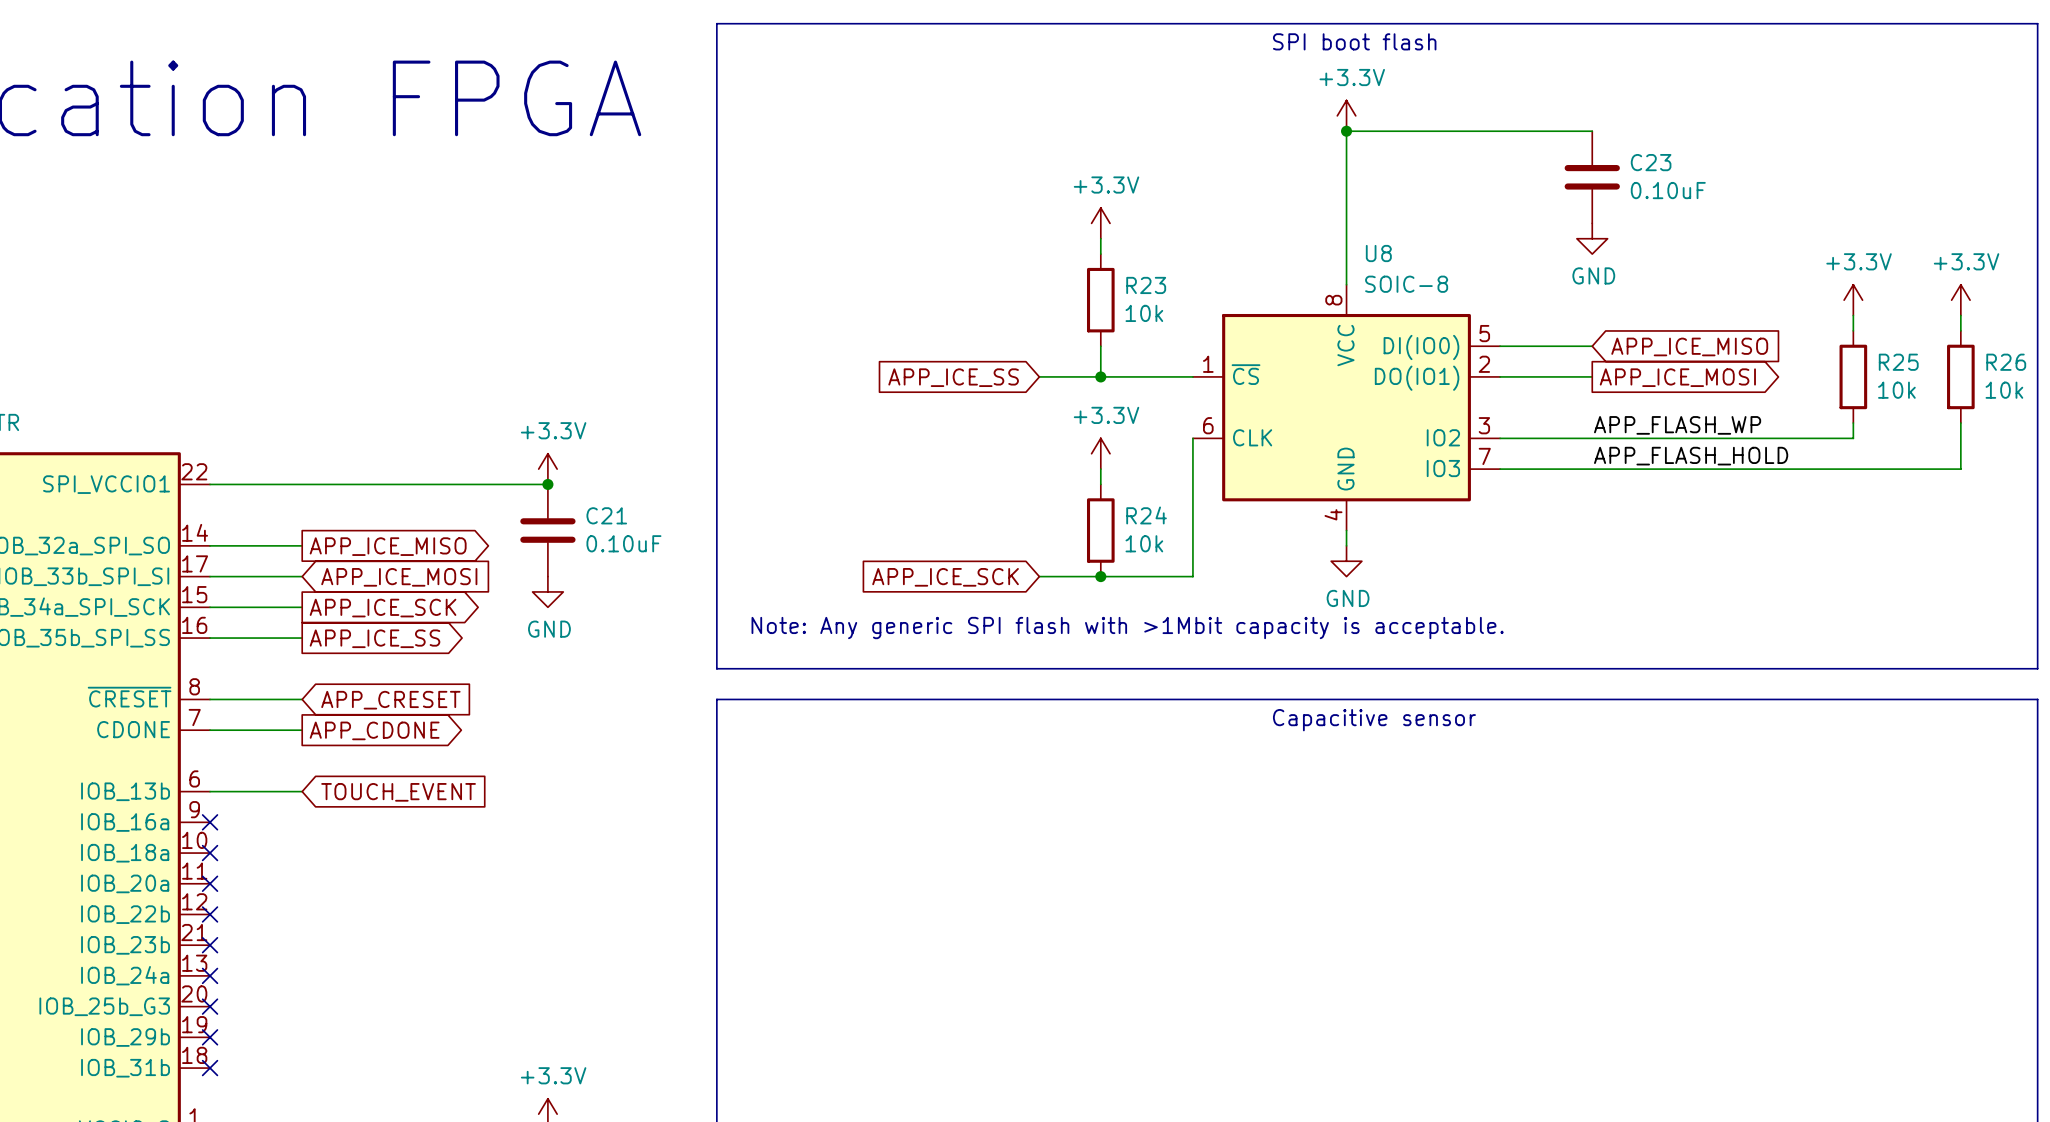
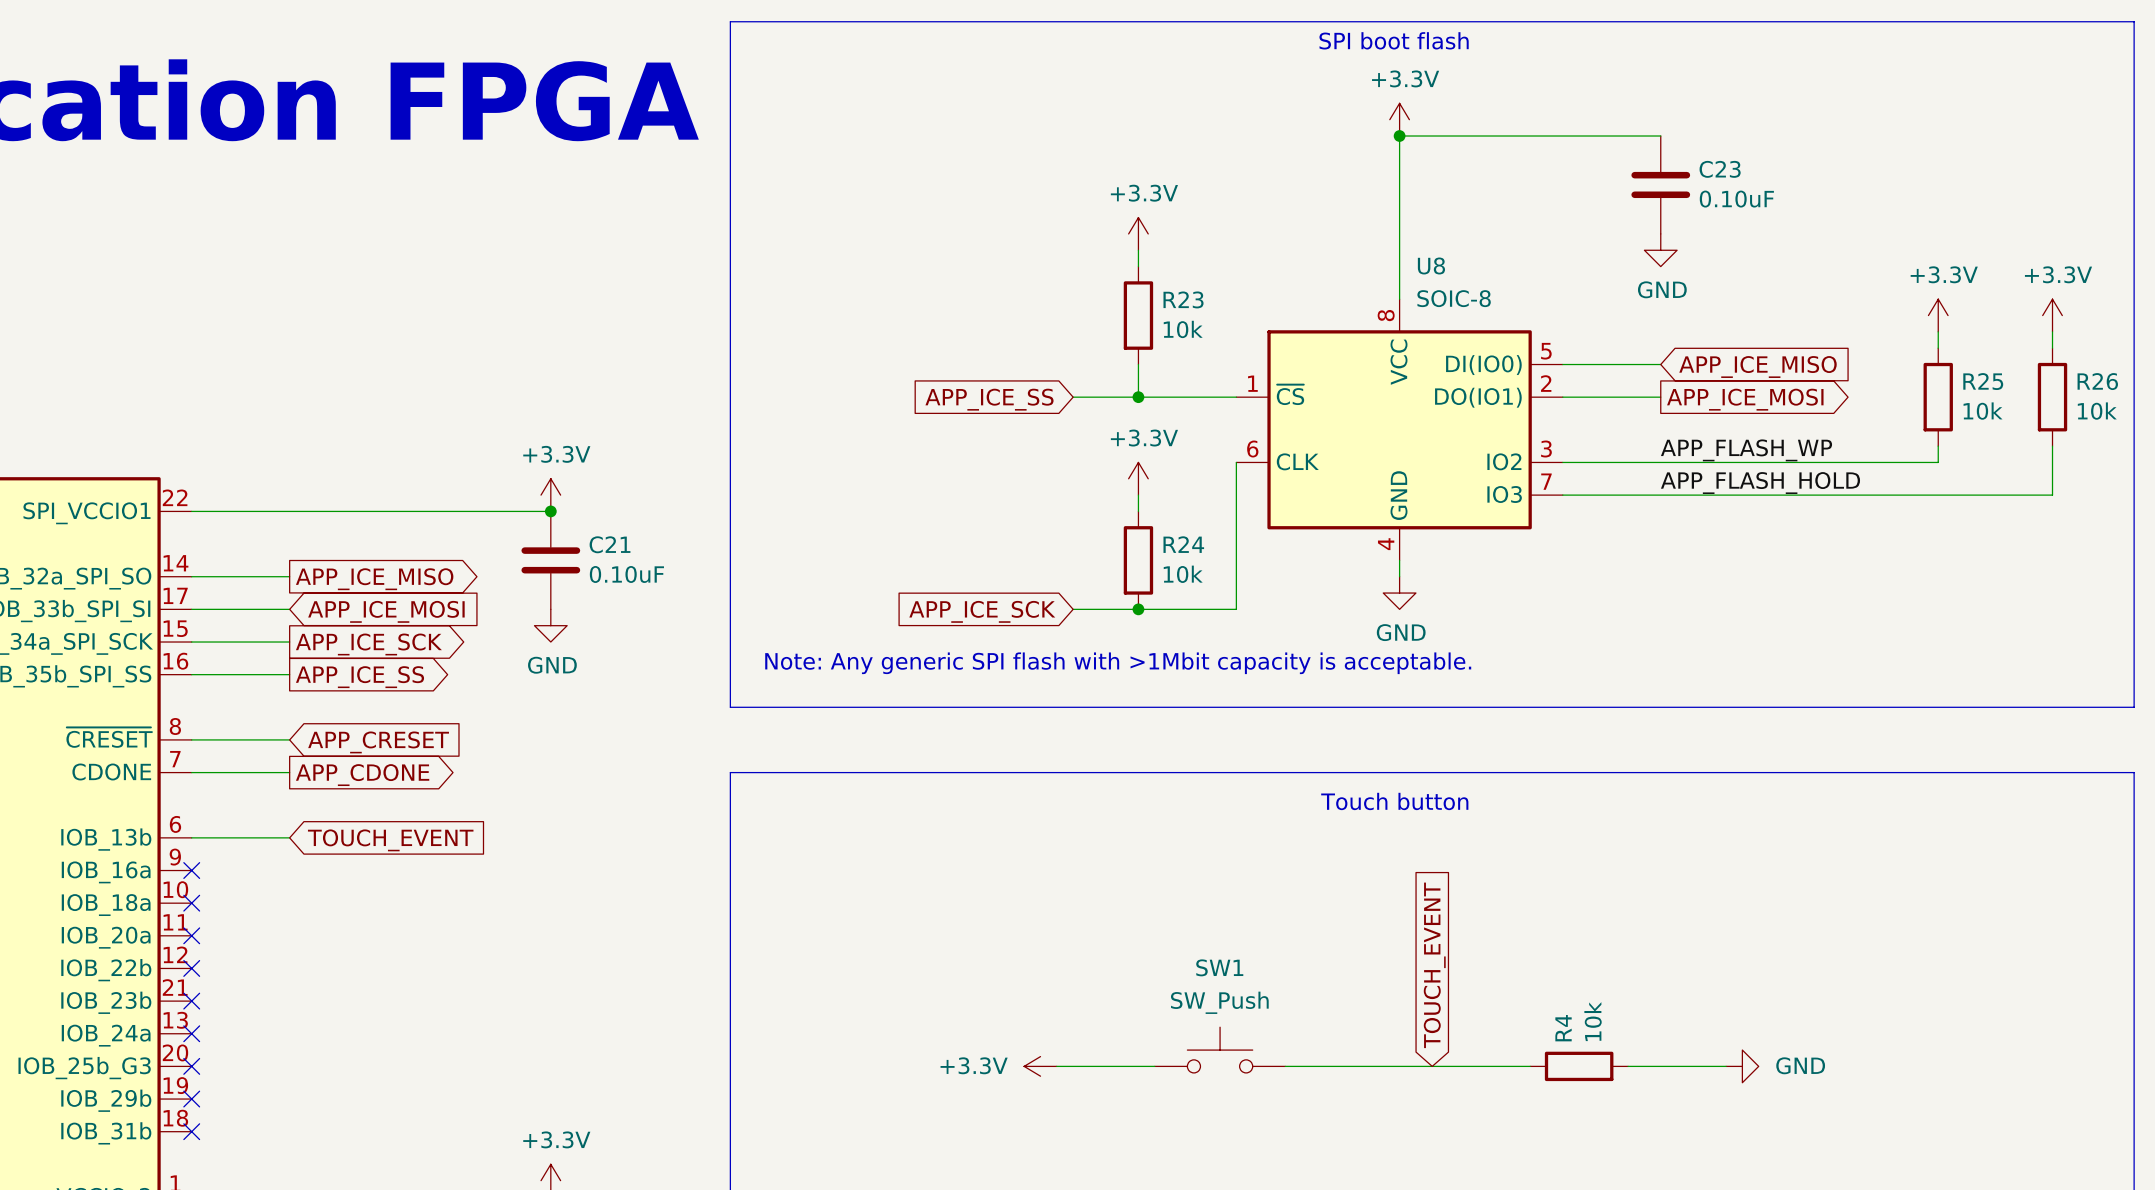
text: Capacitive sensor (1374, 720) -> none
line: (716, 730) (716, 699) (2037, 699) (2037, 730) -> (730, 772) (2134, 772)
text: none -> Touch button (1394, 801)
global label: none -> TOUCH_EVENT (1434, 965)
SW1: none -> SW_Push (1220, 1050)
power symbol: none -> +3.3V (1040, 1066)
wire: none -> (1056, 1066) (1154, 1066)
wire: none -> (1285, 1066) (1530, 1066)
R4: none -> 10k (1579, 1066)
wire: none -> (1628, 1066) (1726, 1066)
power symbol: none -> GND (1742, 1066)

